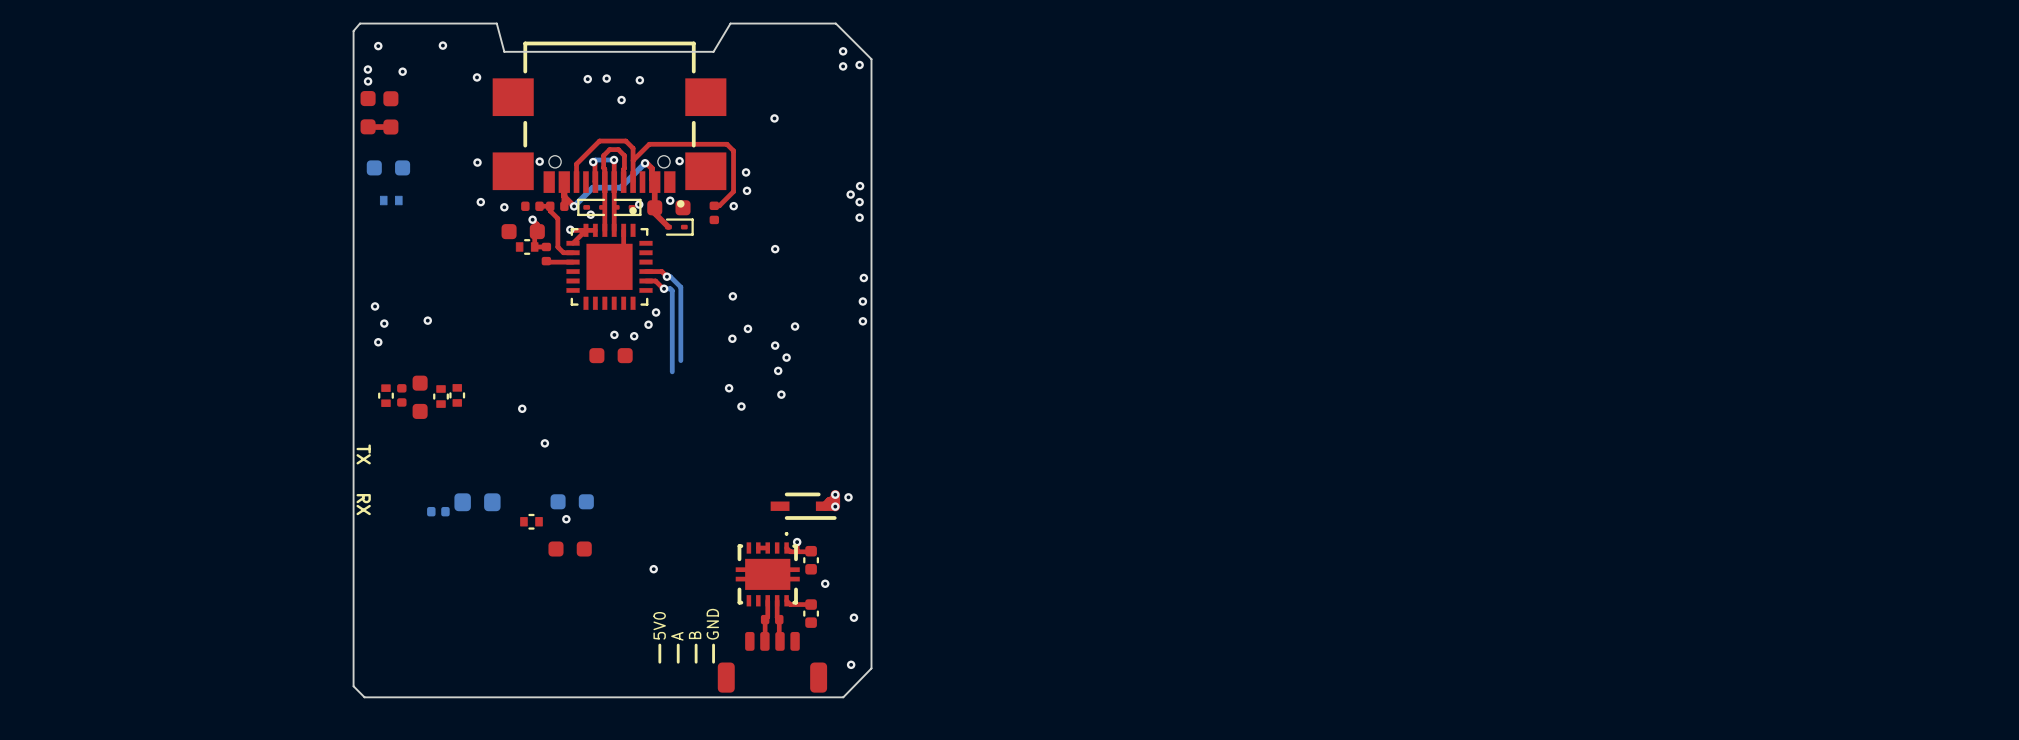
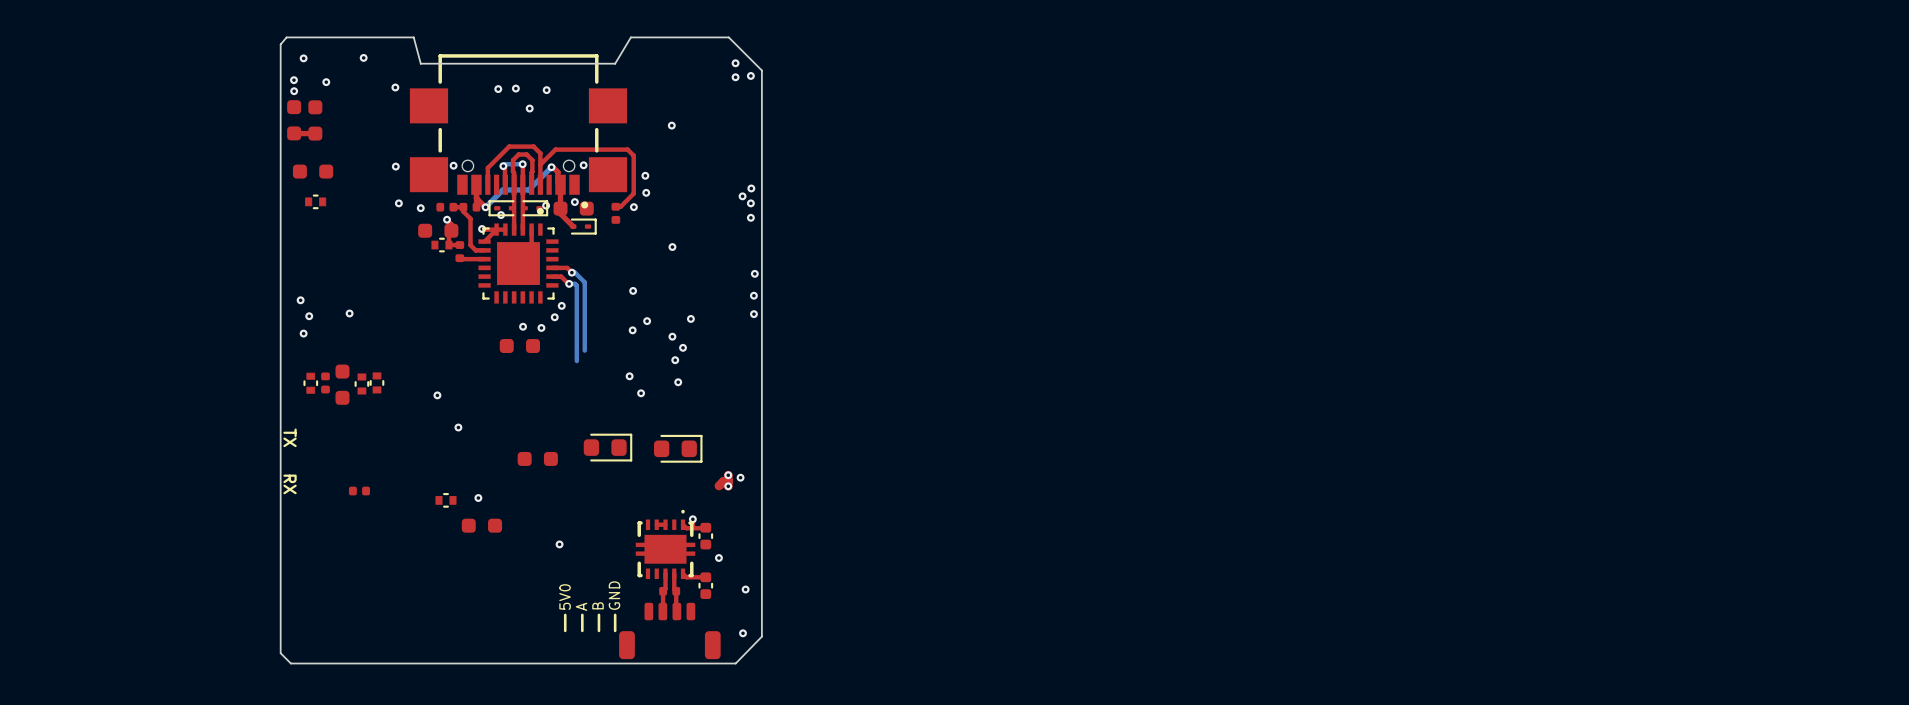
part side: bottom (388, 167) -> top (313, 171)
part side: bottom (391, 200) -> top (315, 201)
part: none -> (678, 448)
part side: bottom (572, 501) -> top (537, 458)
part side: bottom (477, 502) -> top (608, 447)
part: (803, 506) -> none
part side: bottom (438, 511) -> top (359, 491)

